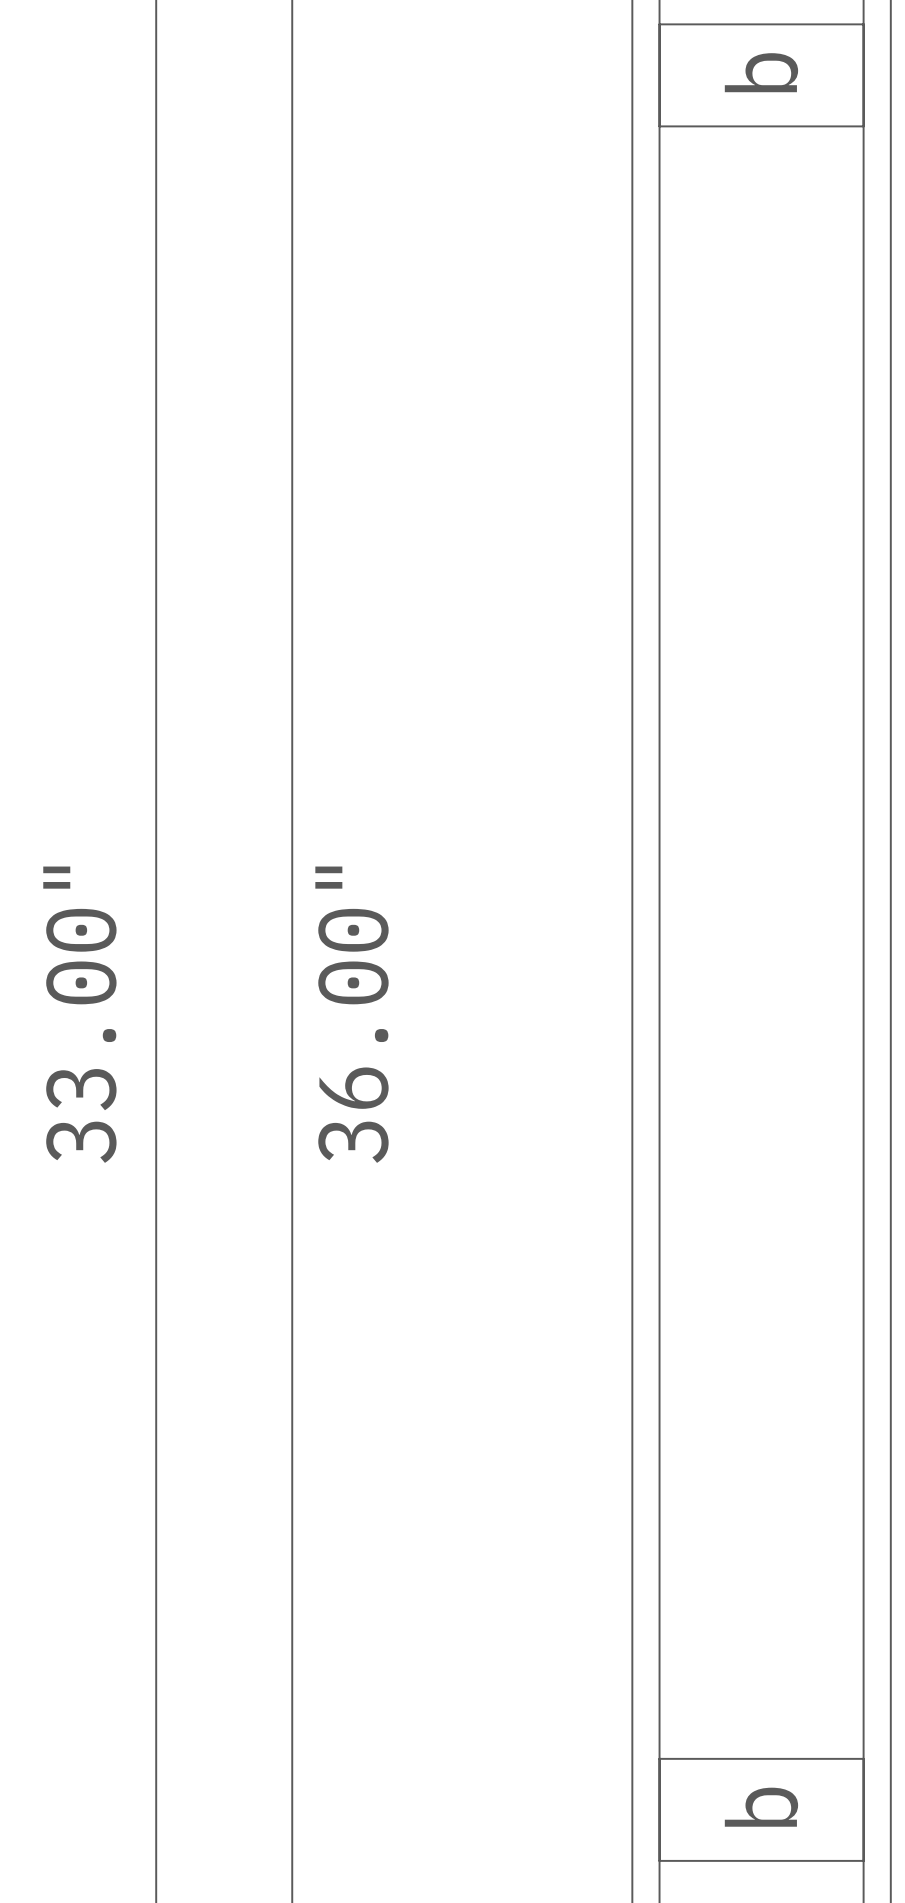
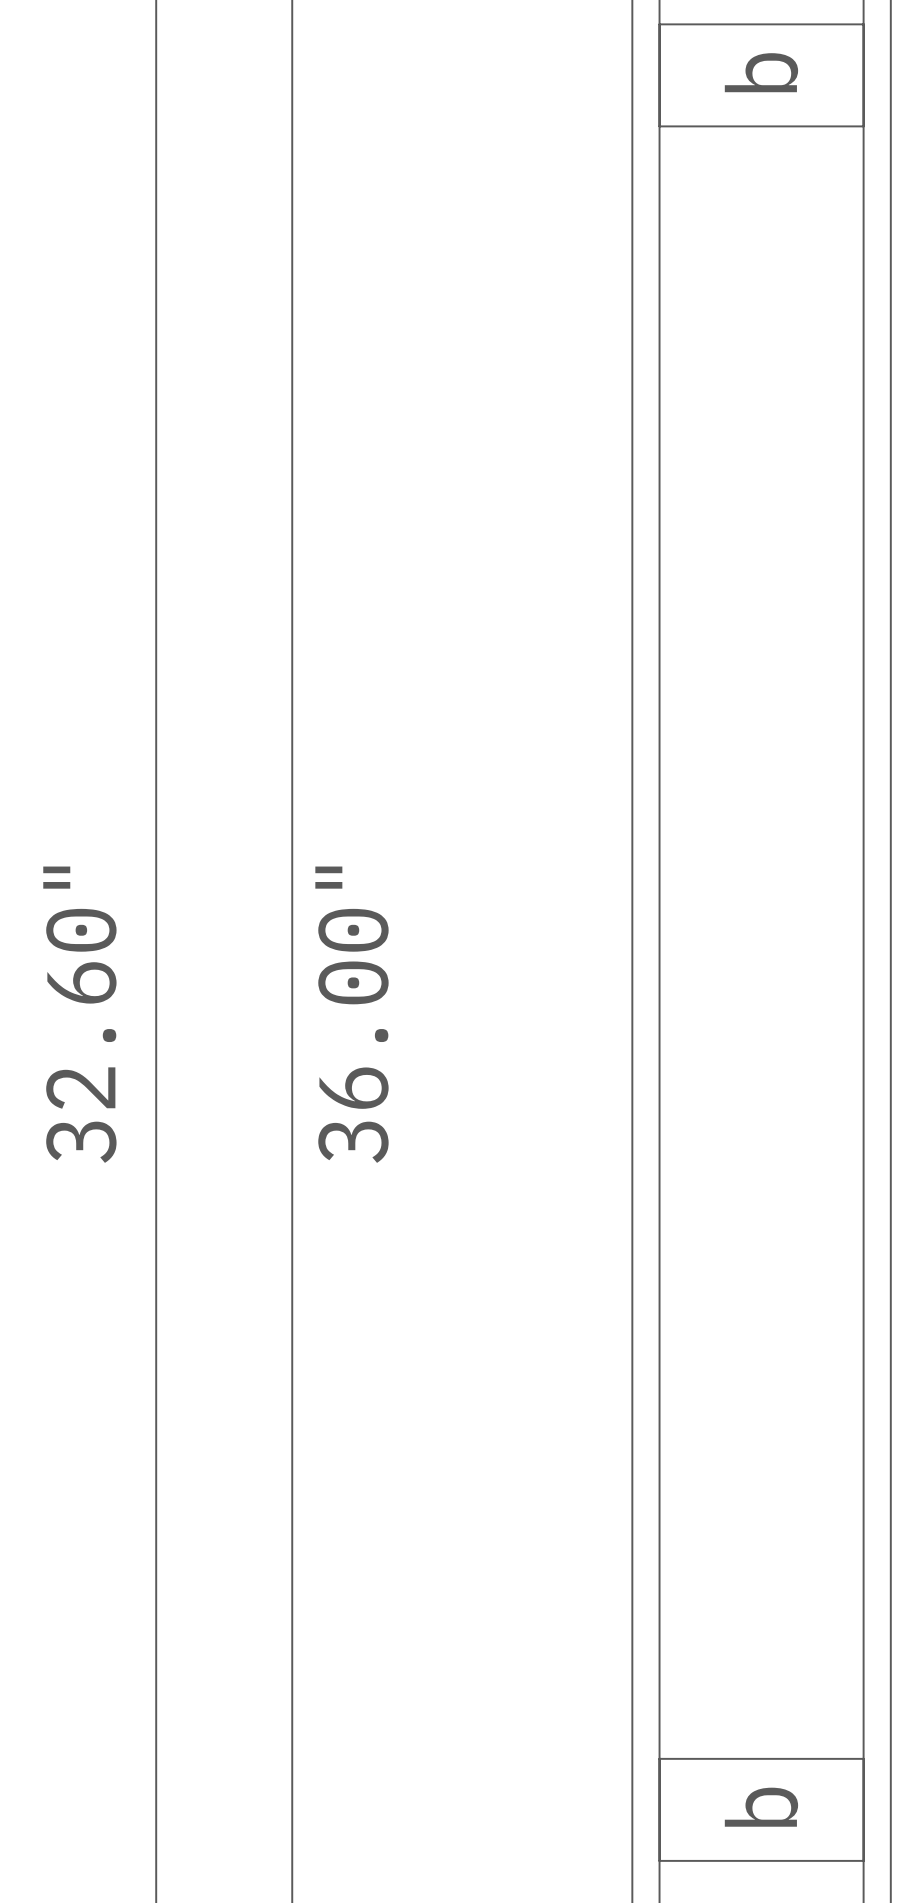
text: 33.00" (79, 1014) -> 32.60" (79, 1014)

